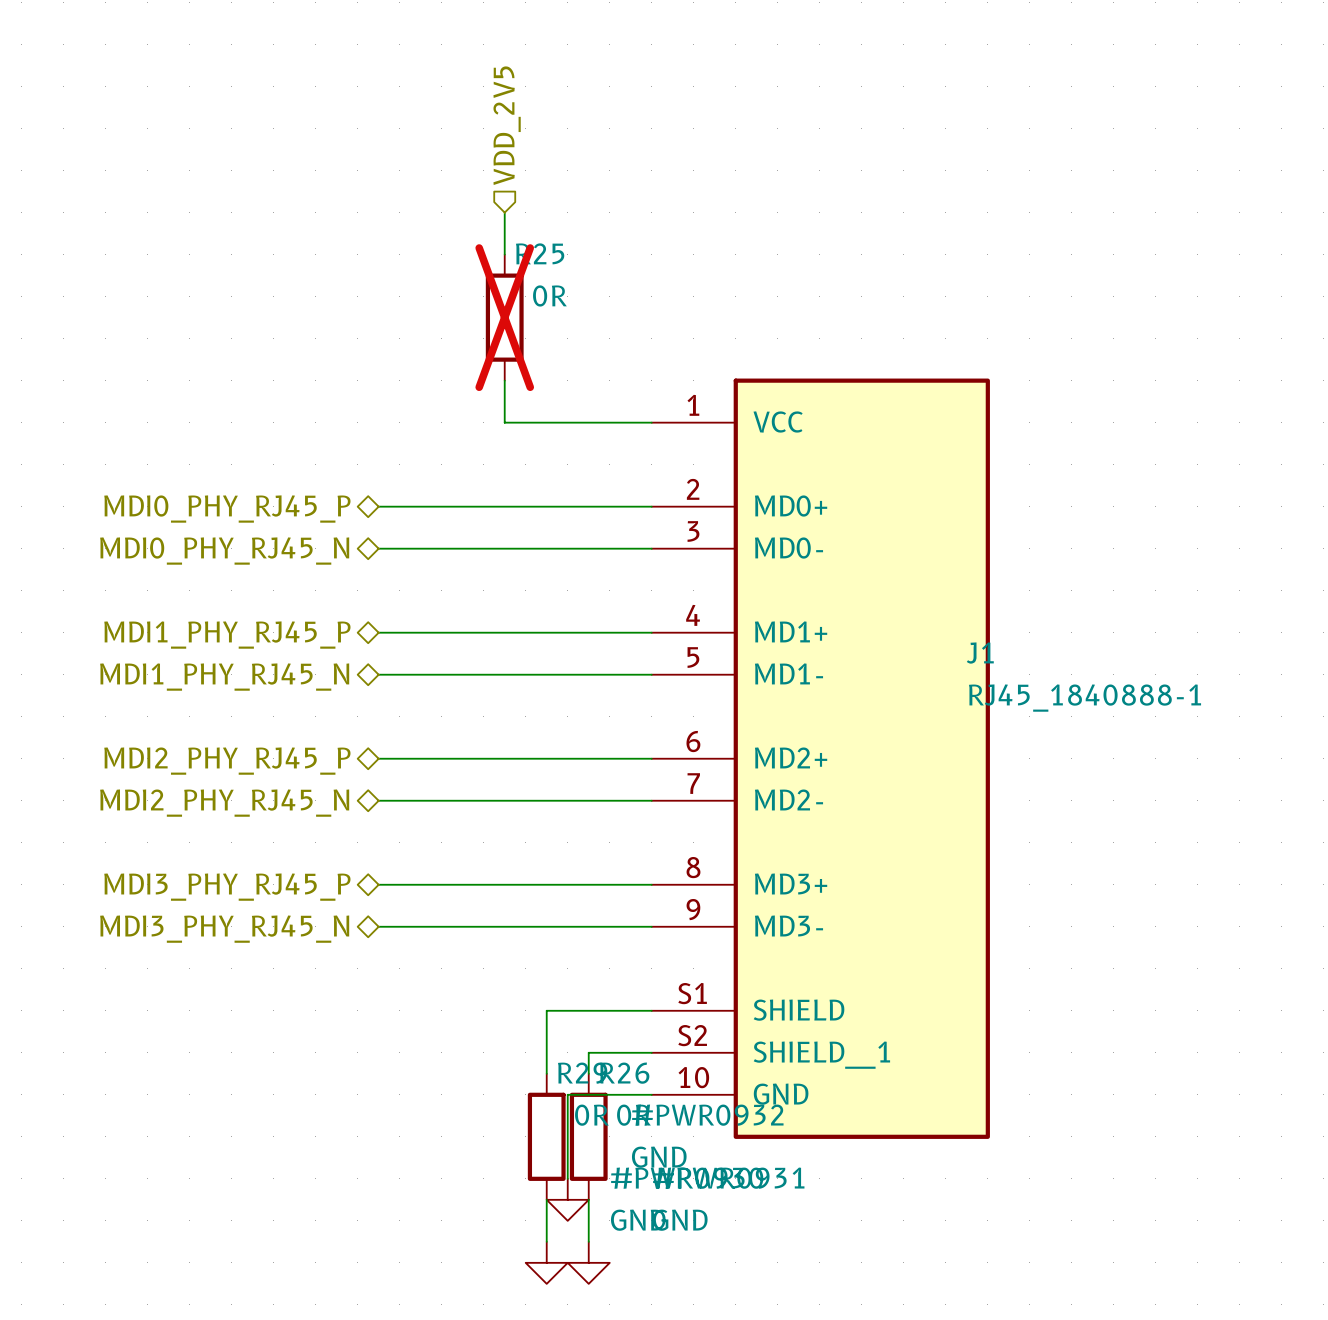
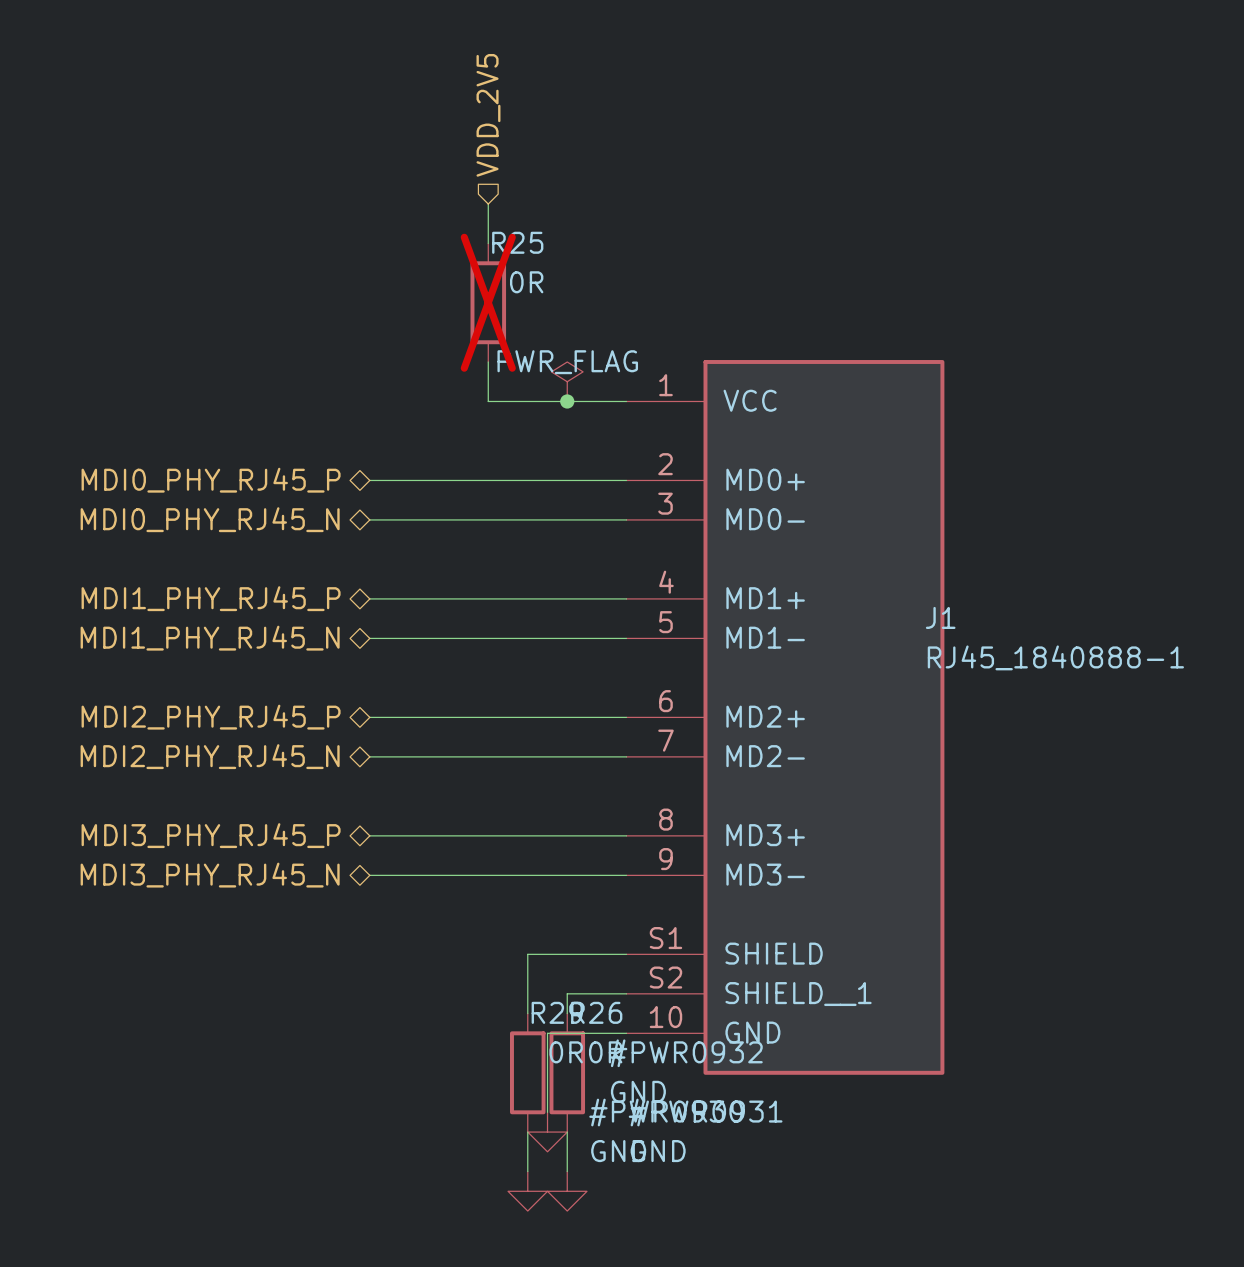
power symbol: none -> PWR_FLAG (567, 381)
junction: none -> (567, 401)

